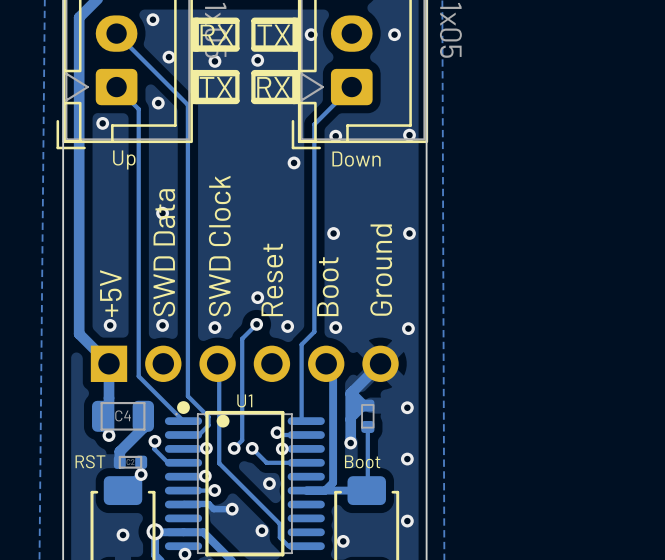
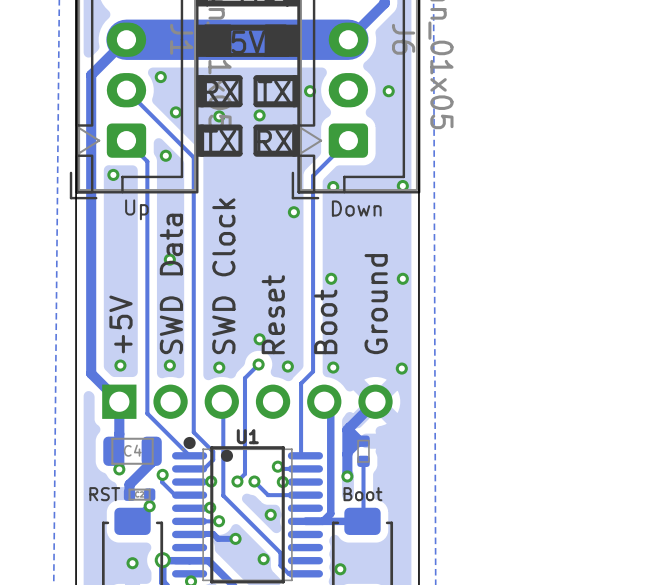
via: (407, 407) -> none
via: (407, 459) -> none
via: (407, 521) -> none

